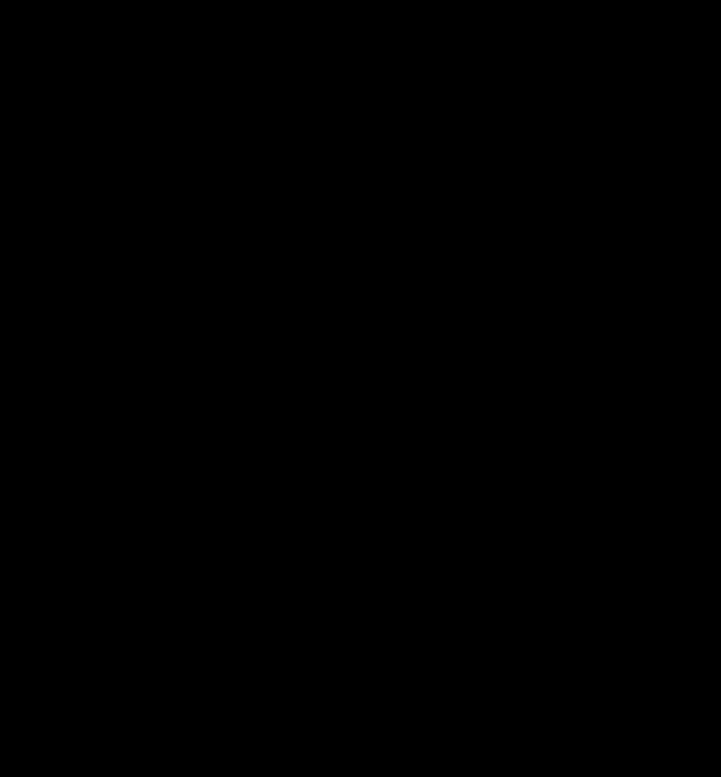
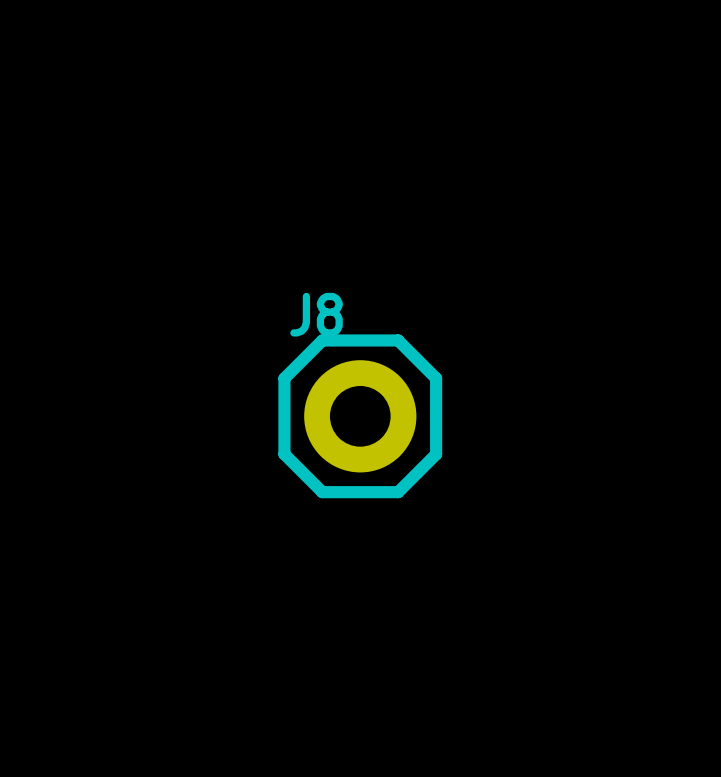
J8: none -> (360, 416)

